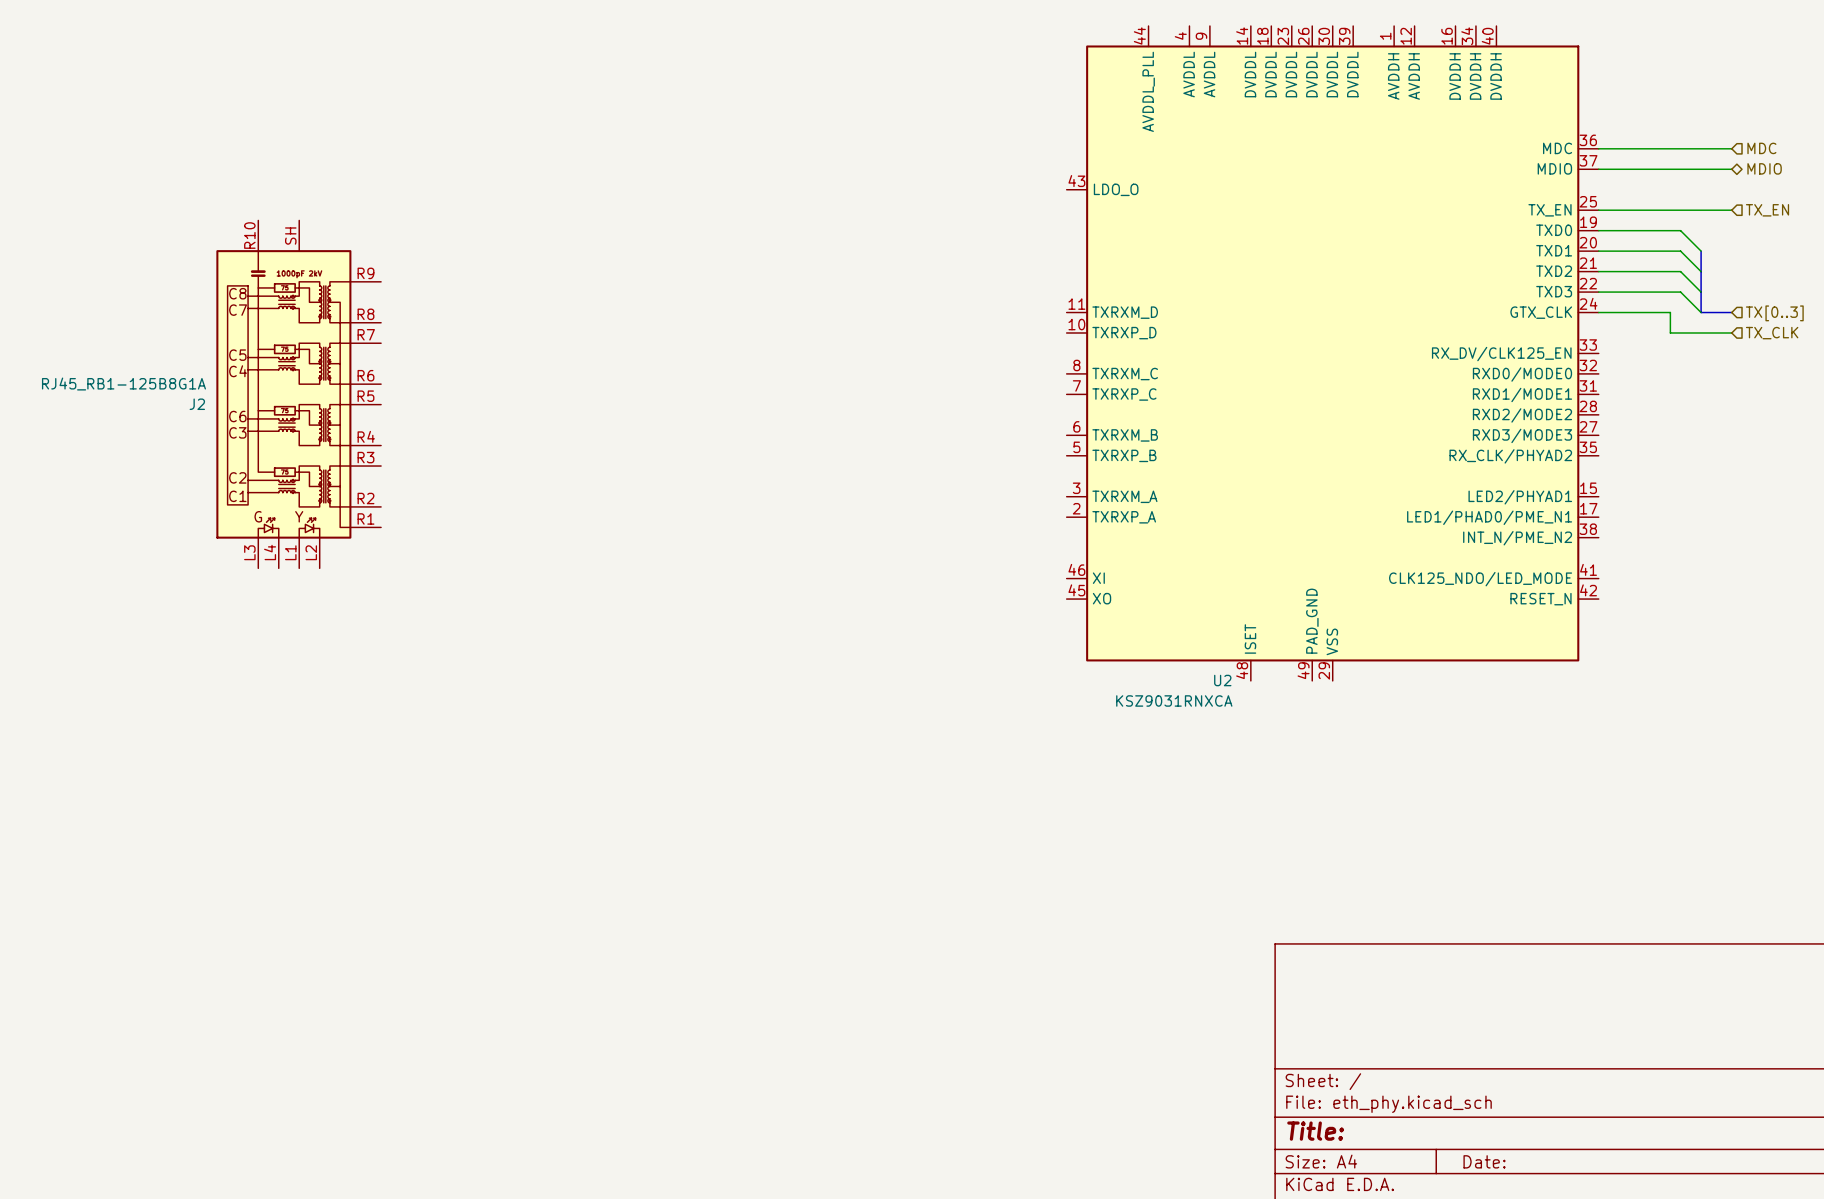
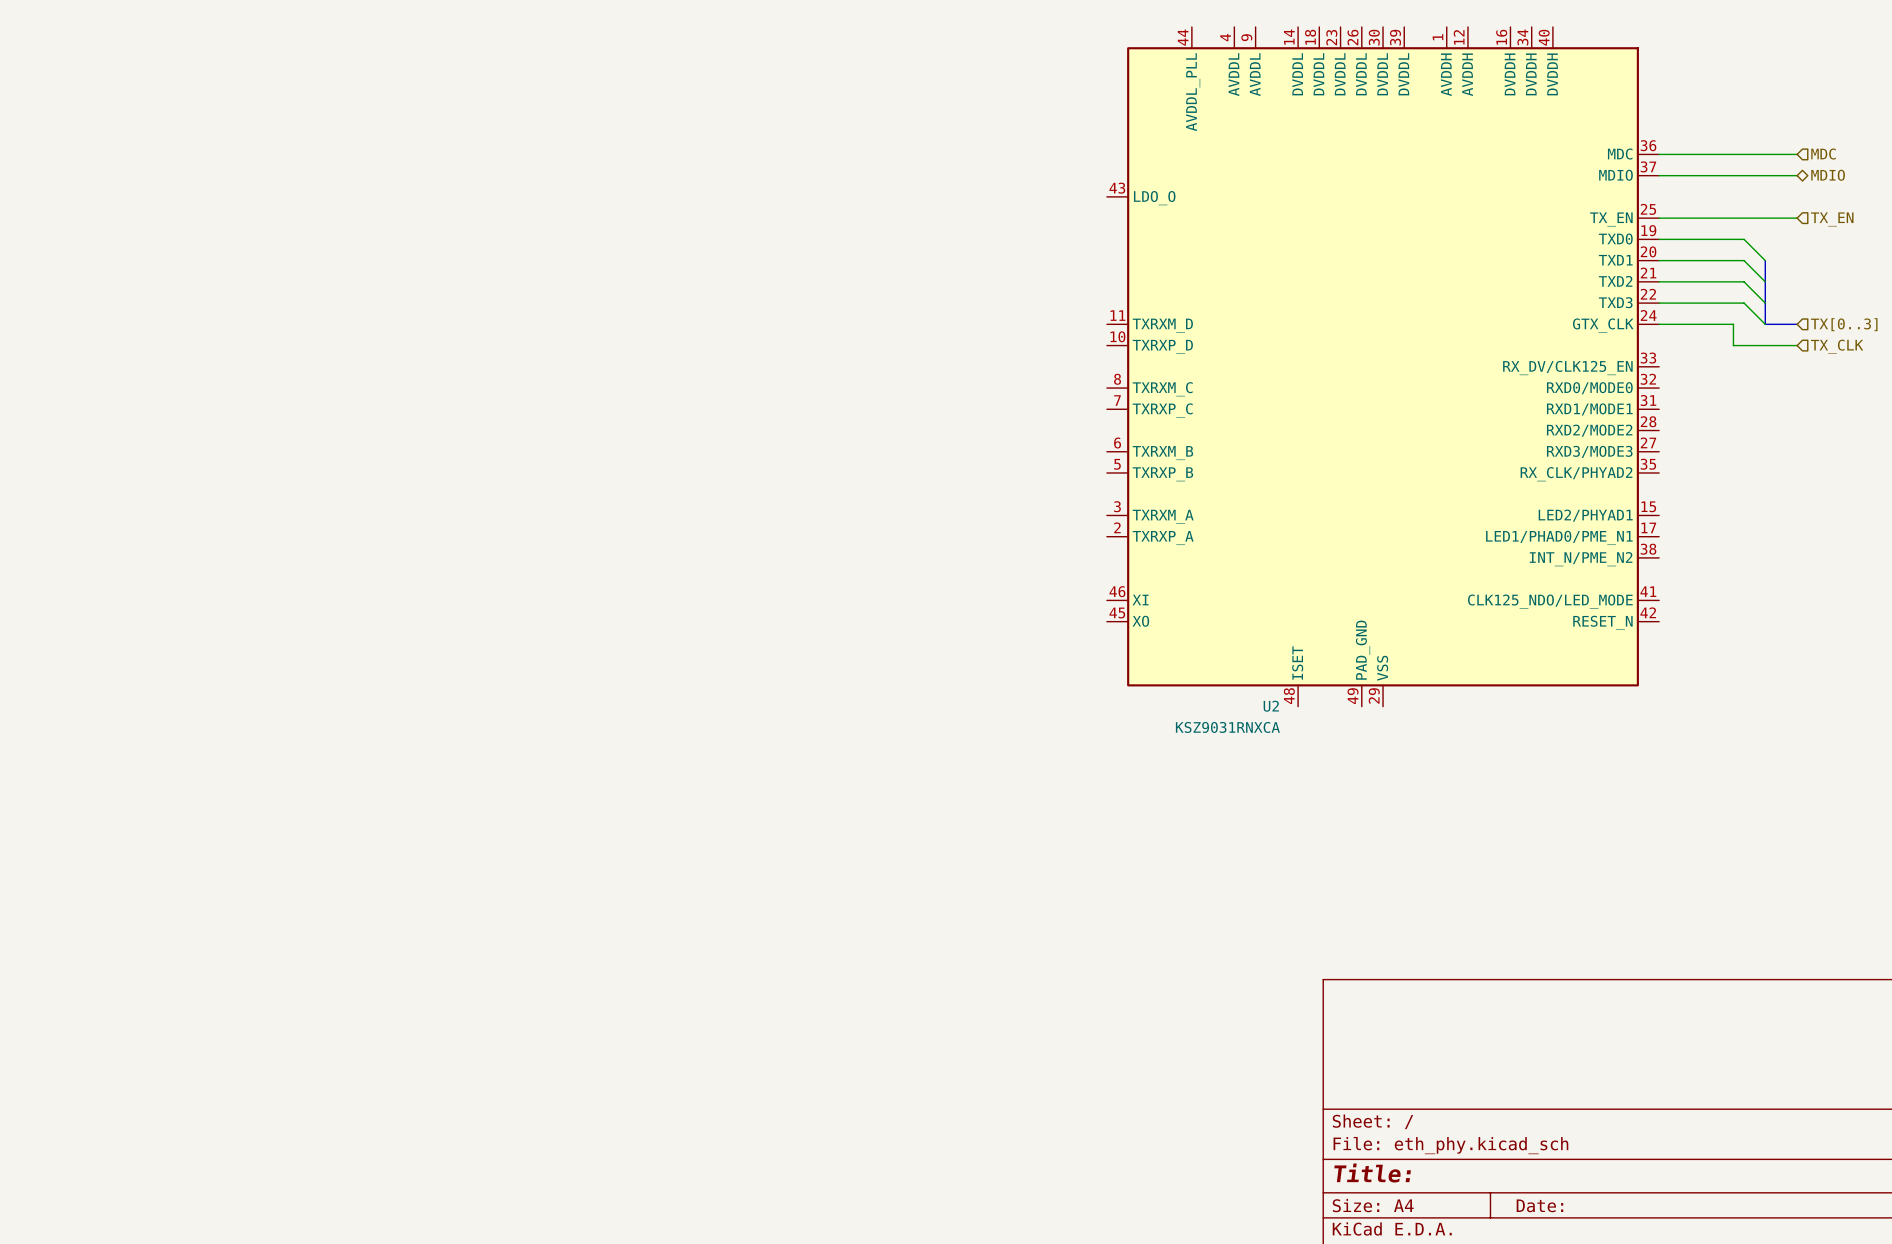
J2: RJ45_RB1-125B8G1A (298, 394) -> none

